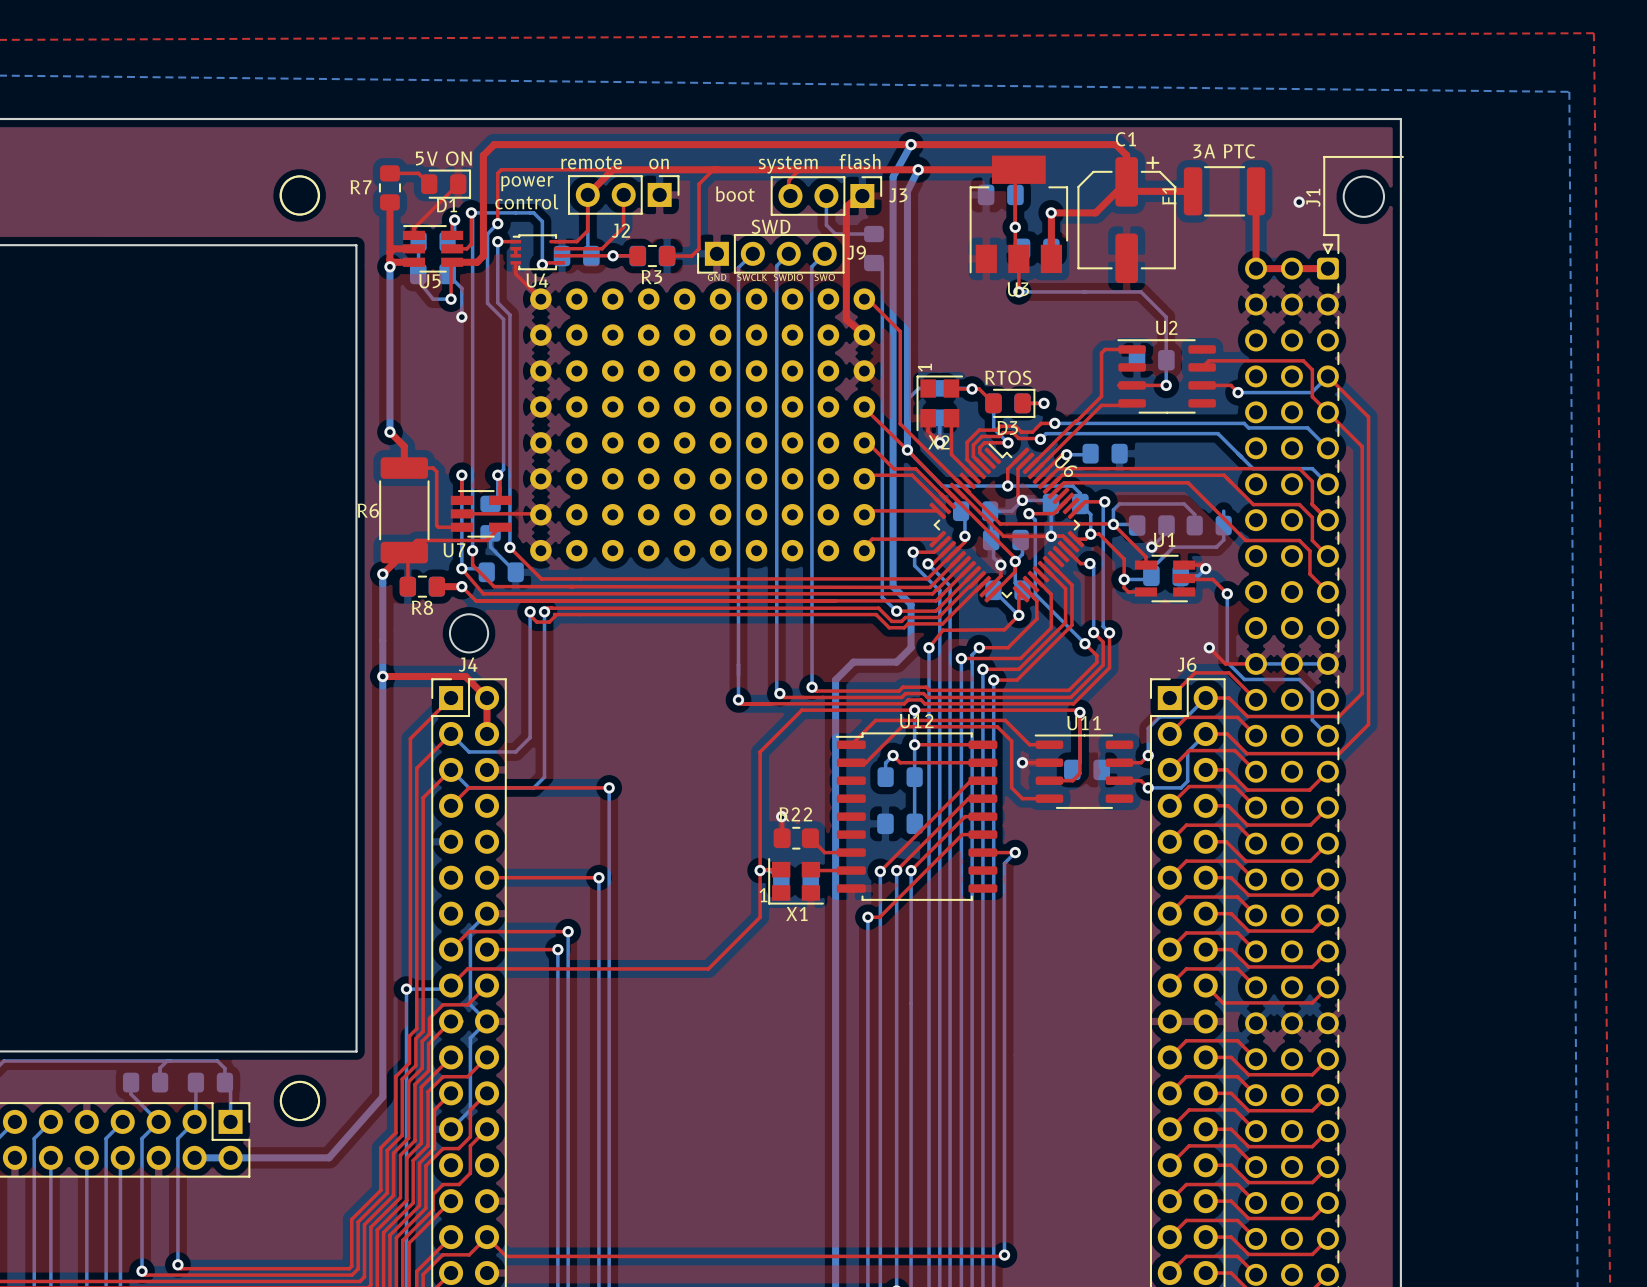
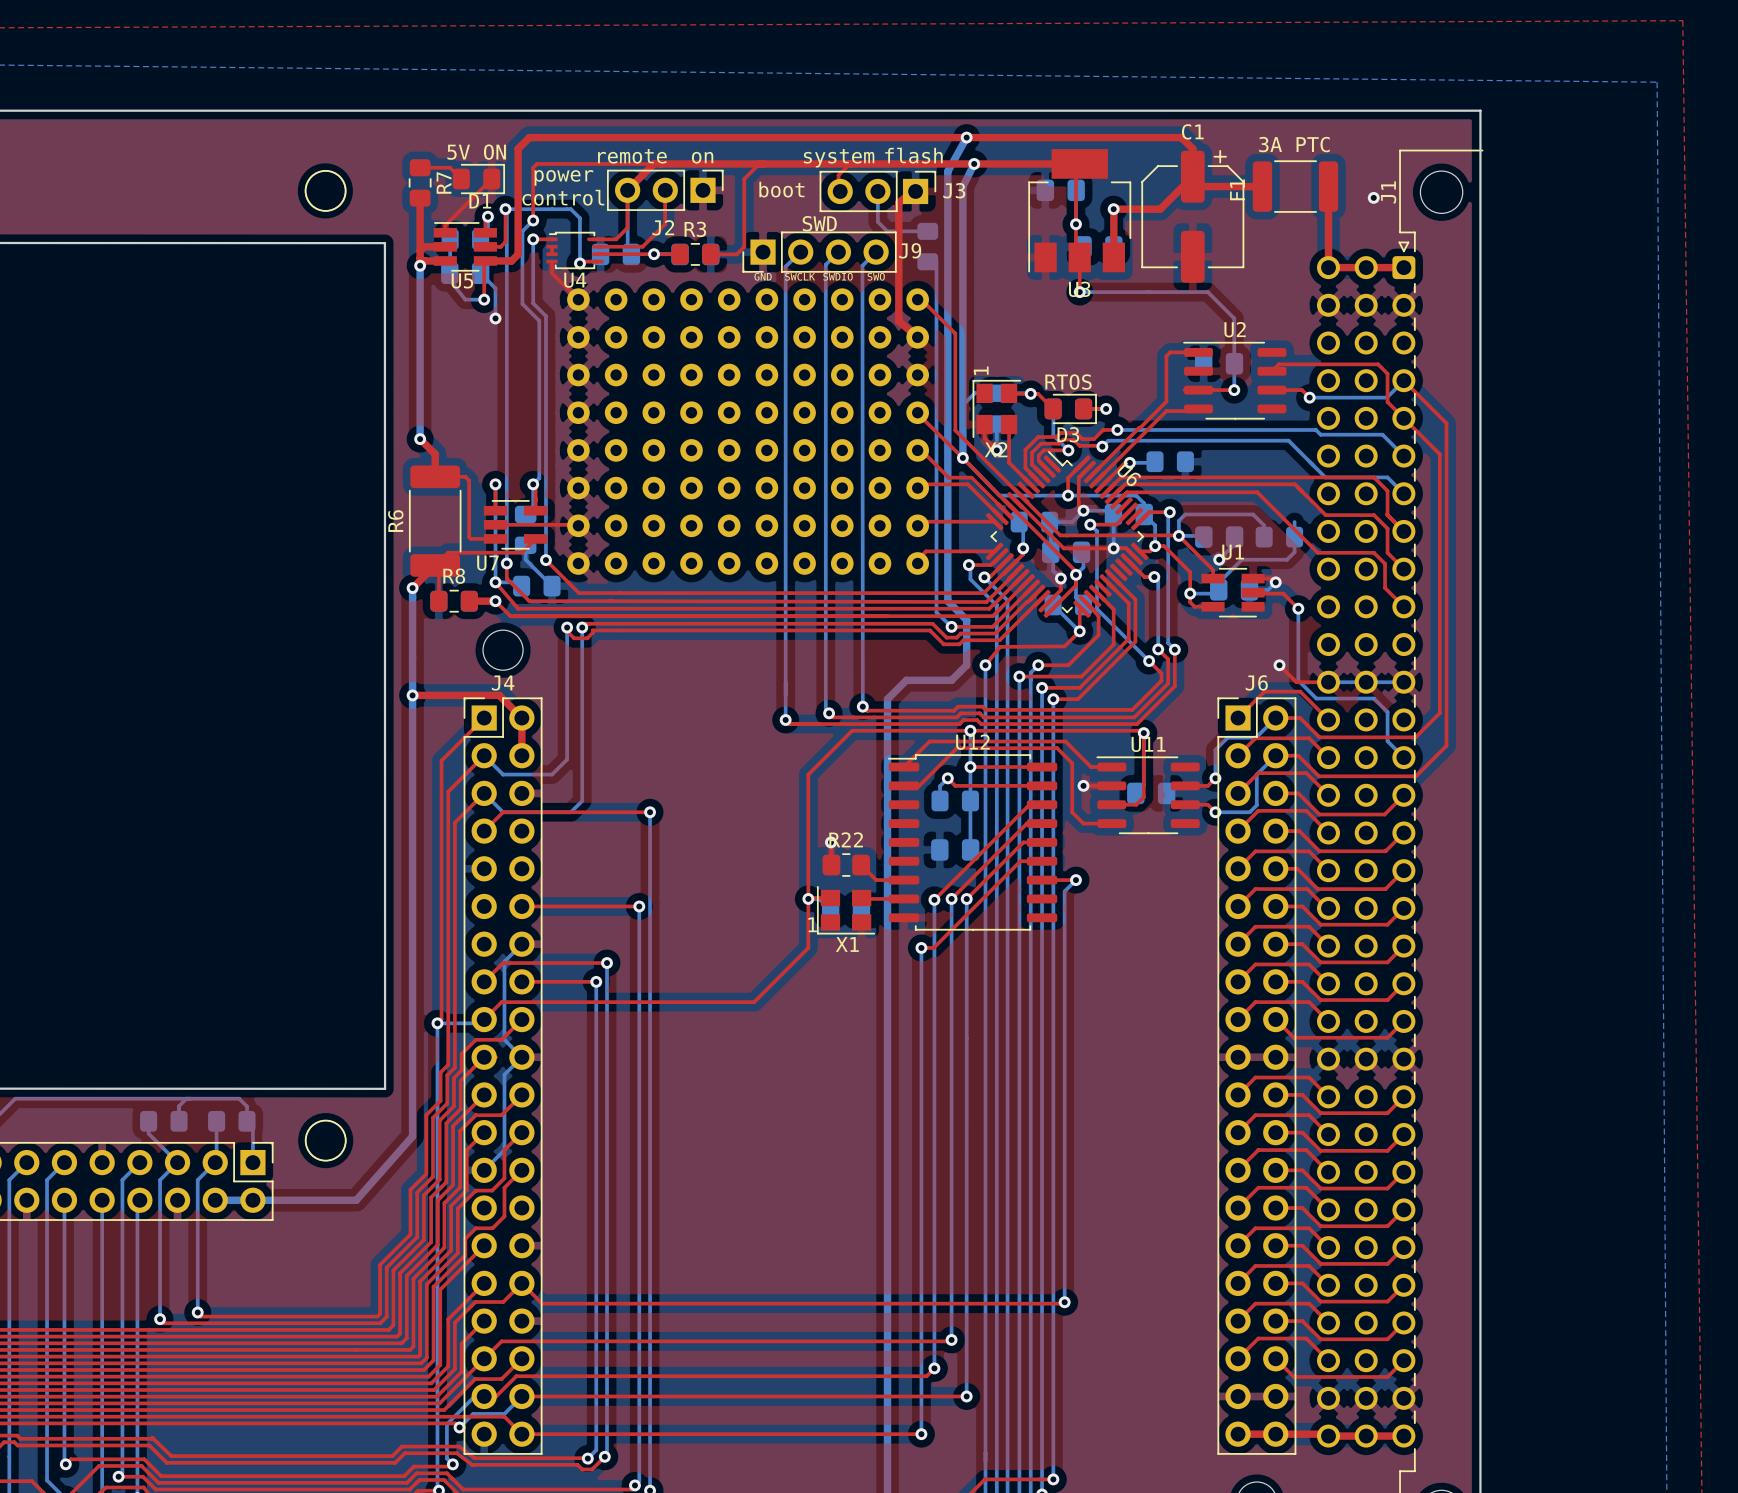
R7 name rotation: 0° (361, 187) -> 90° counterclockwise (444, 182)
R7 name position: R7 (361, 187) -> R7 (444, 182)
R3 name position: R3 (651, 277) -> R3 (695, 229)
R6 name rotation: 0° (368, 510) -> 90° counterclockwise (395, 521)
R8 name position: R8 (422, 607) -> R8 (454, 576)

